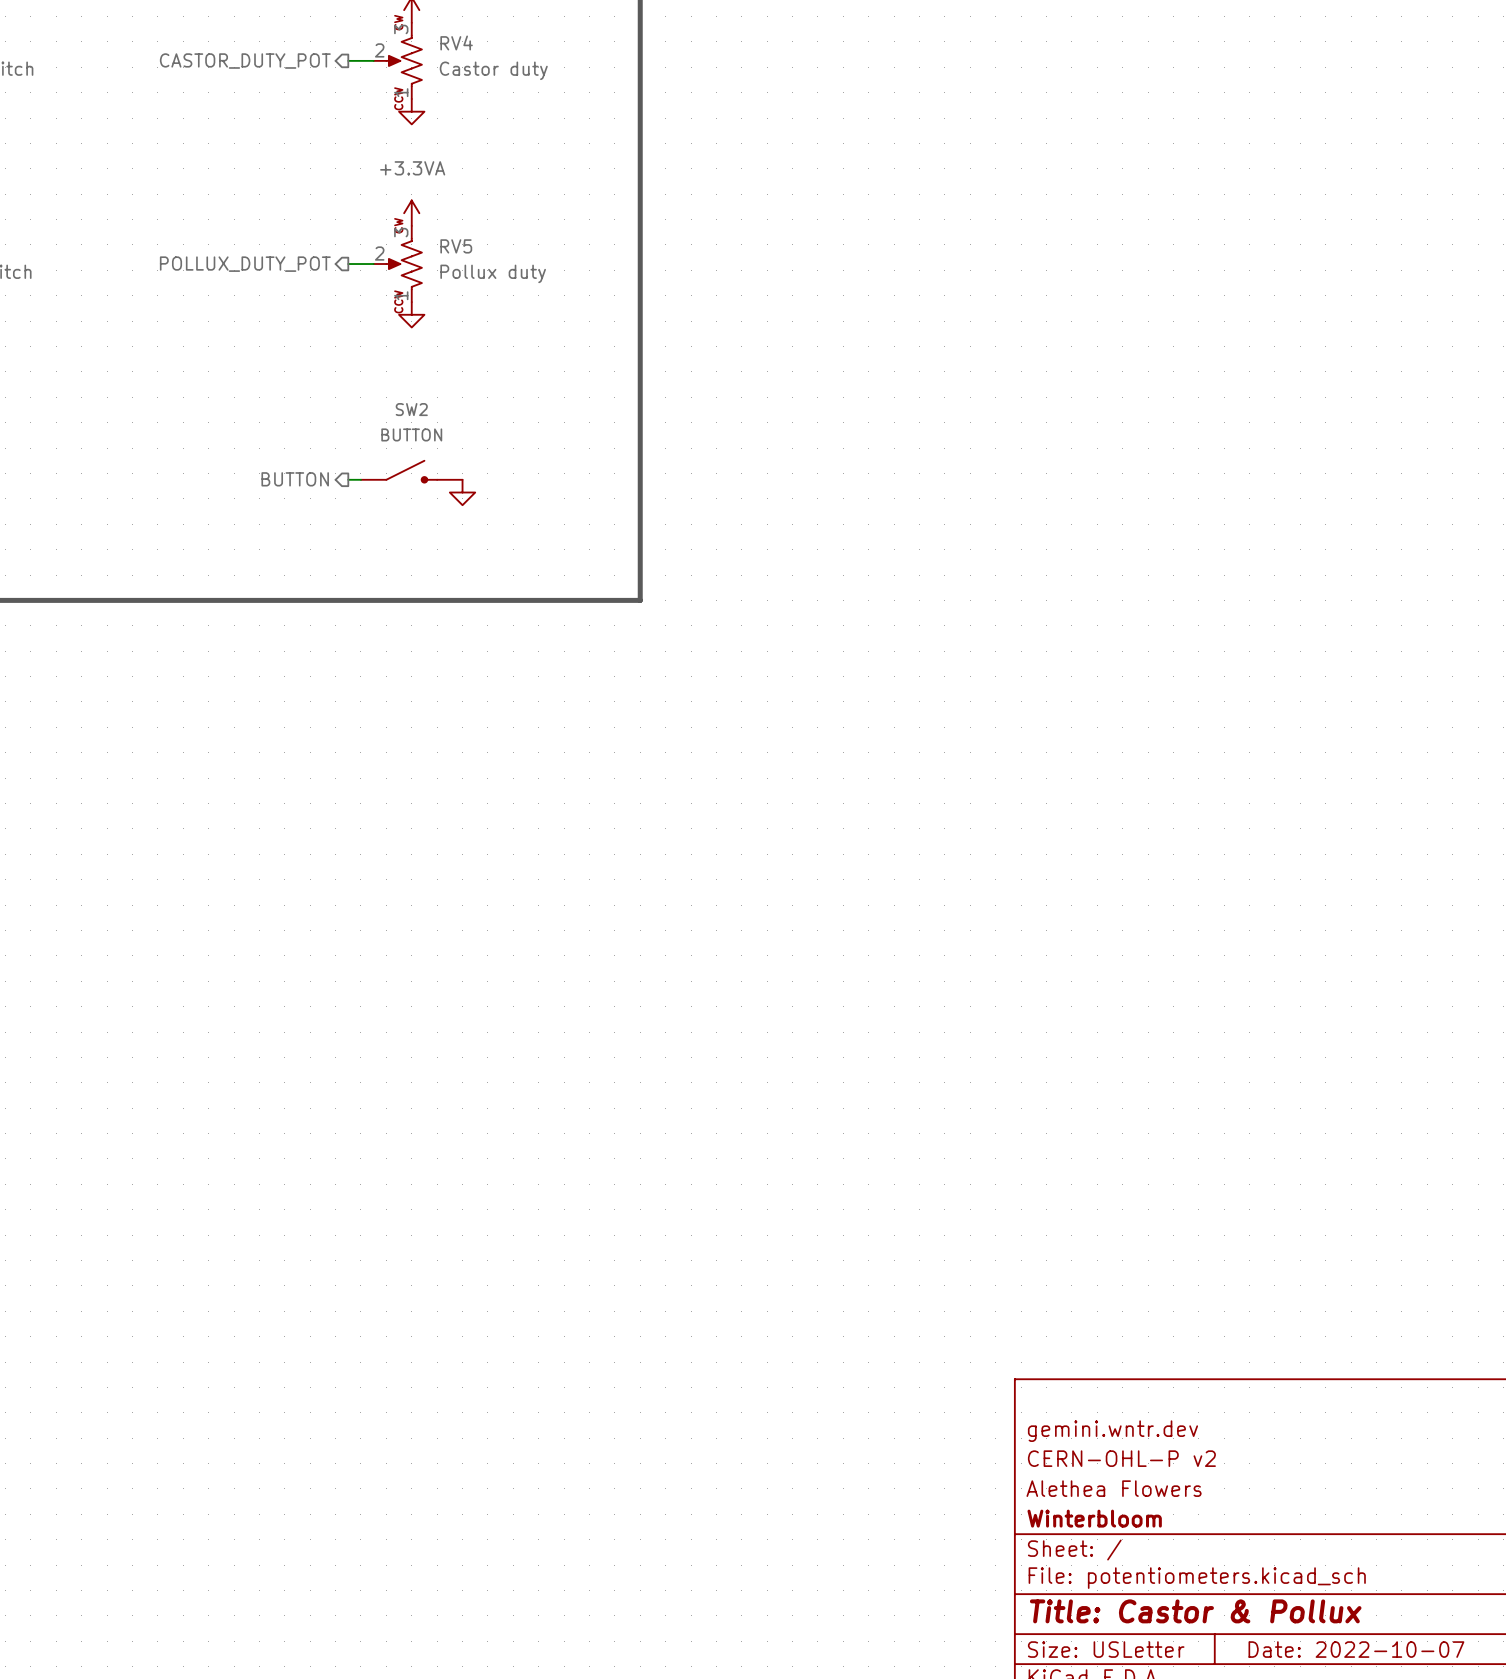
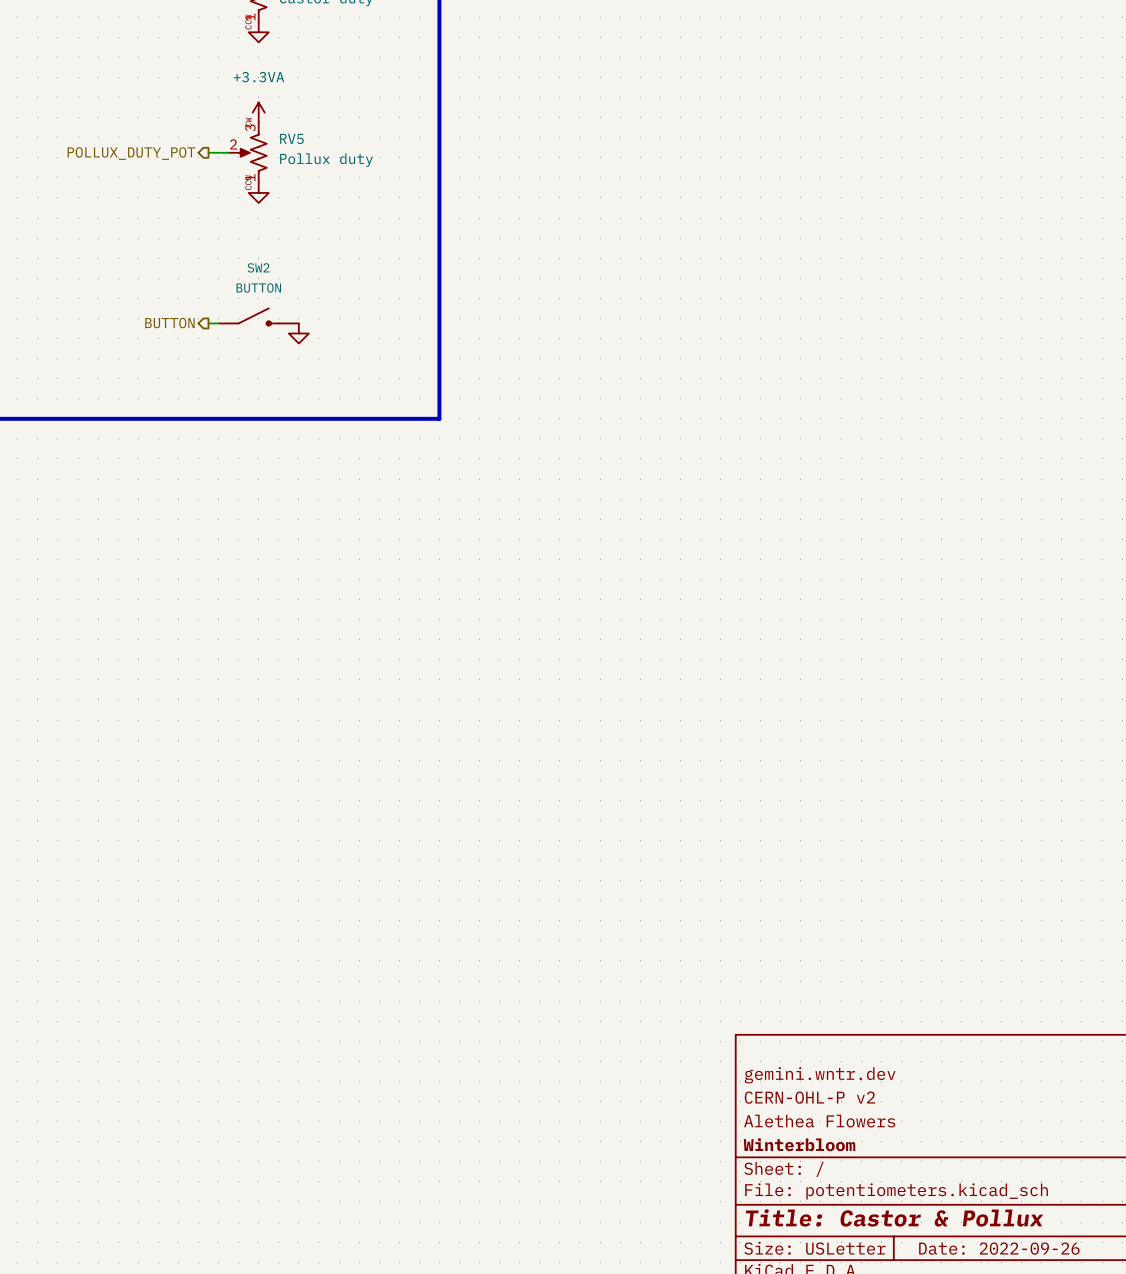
title block: Date: 2022-10-07 (1356, 1649) -> Date: 2022-09-26 (999, 1248)

